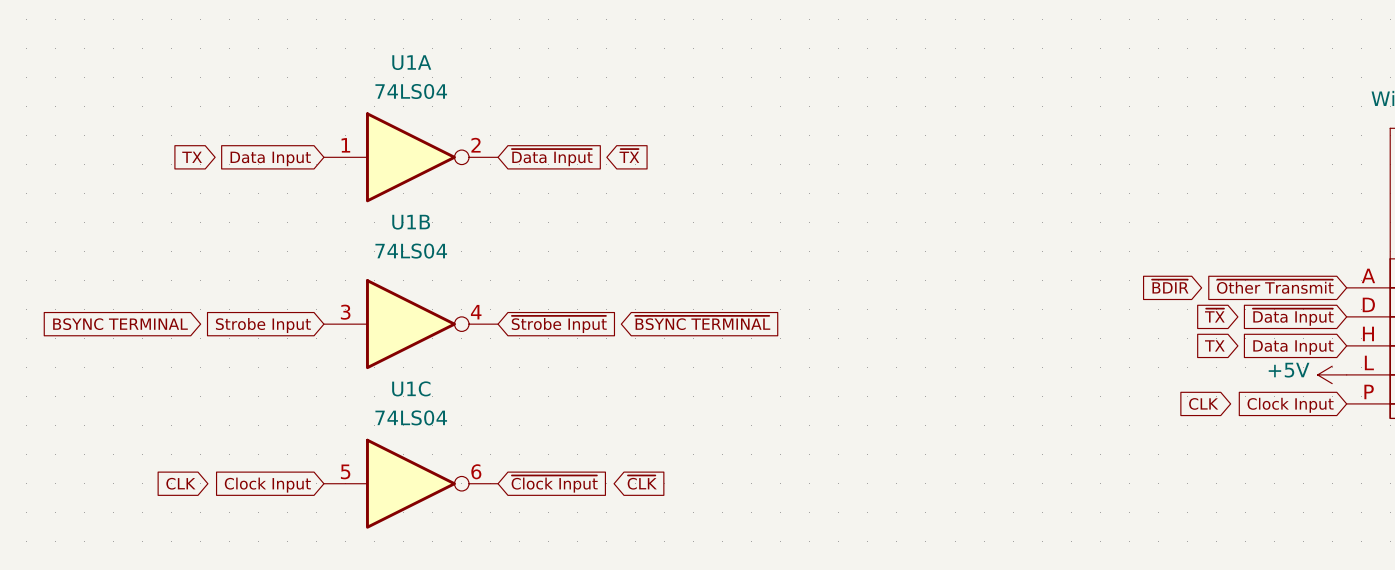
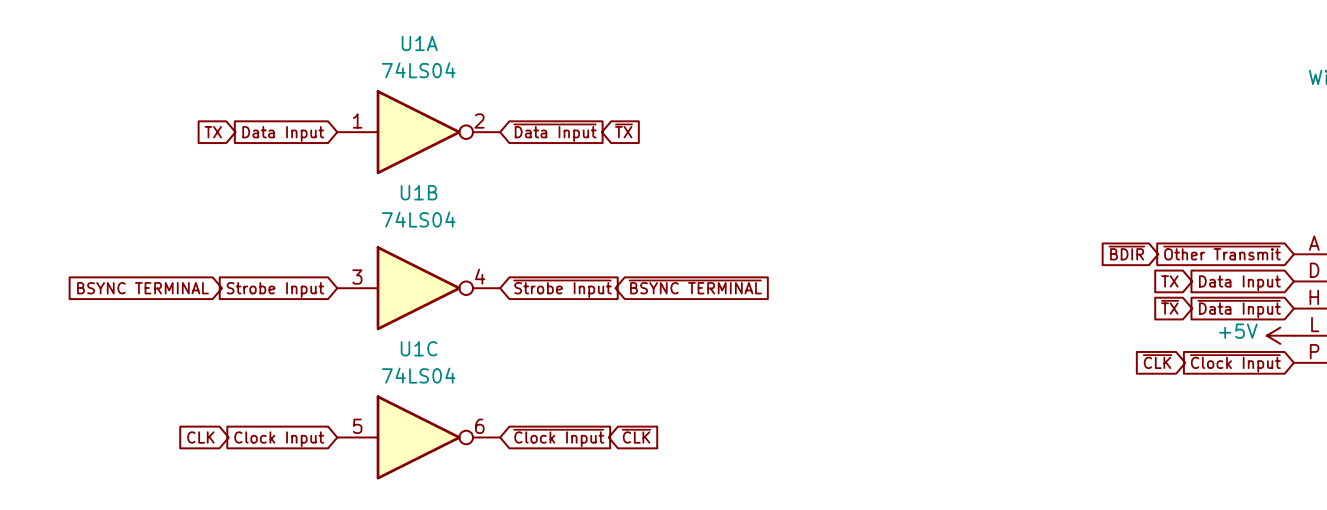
global label: ~{TX} (1214, 315) -> TX (1169, 281)
global label: ~{Data Input} (1293, 317) -> Data Input (1239, 283)
global label: TX (1214, 345) -> ~{TX} (1170, 307)
global label: Data Input (1293, 347) -> ~{Data Input} (1239, 309)
global label: CLK (1203, 403) -> ~{CLK} (1157, 361)
global label: Clock Input (1290, 405) -> ~{Clock Input} (1235, 363)

